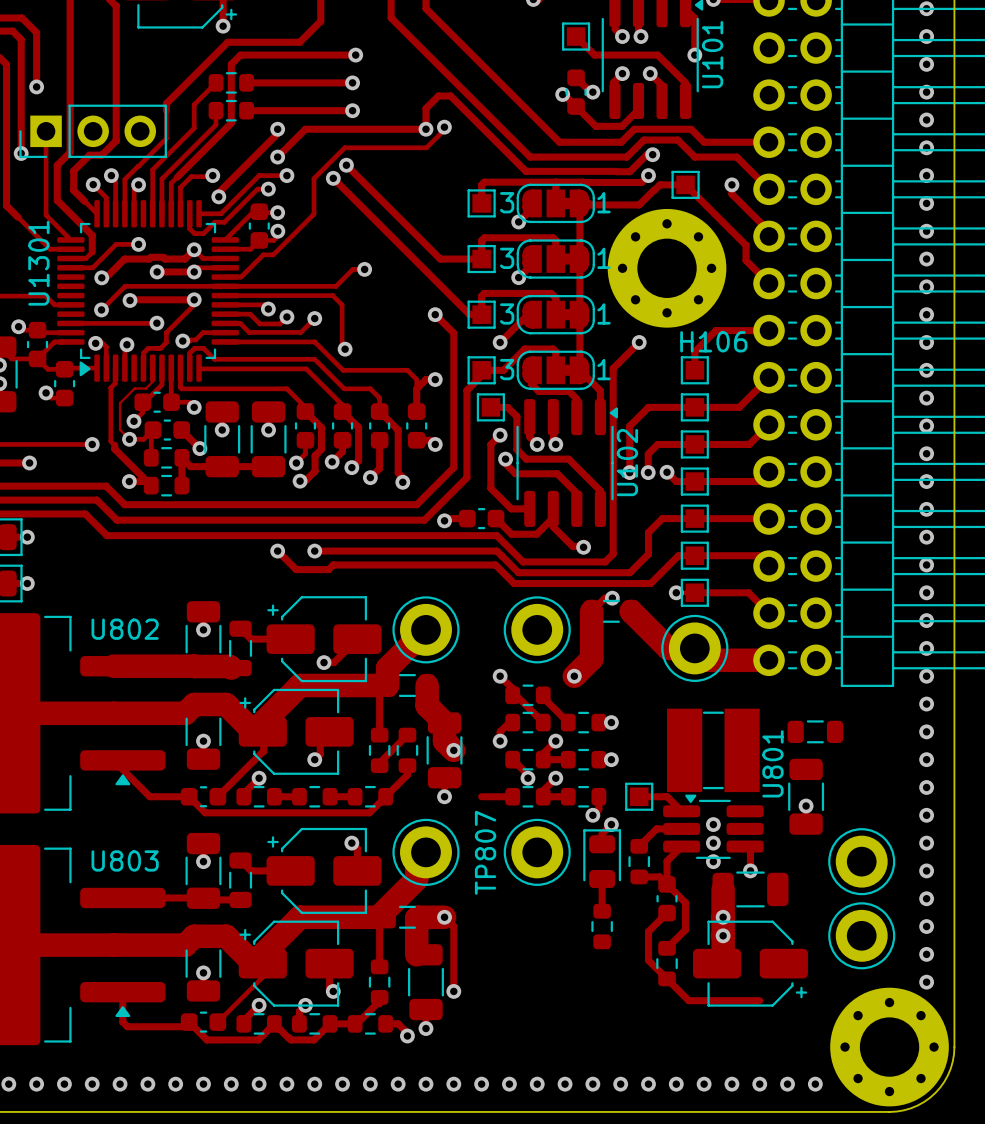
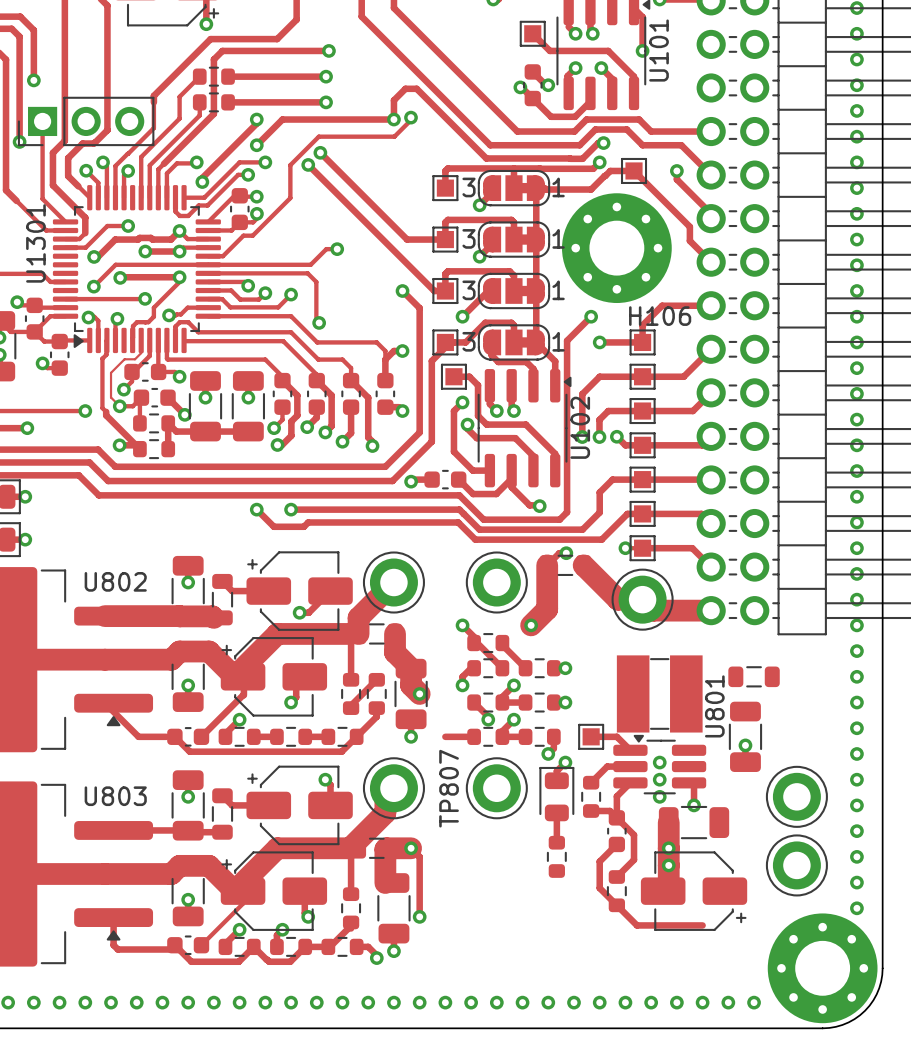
track: none -> (599, 342) (642, 342)
via: none -> (599, 342)

